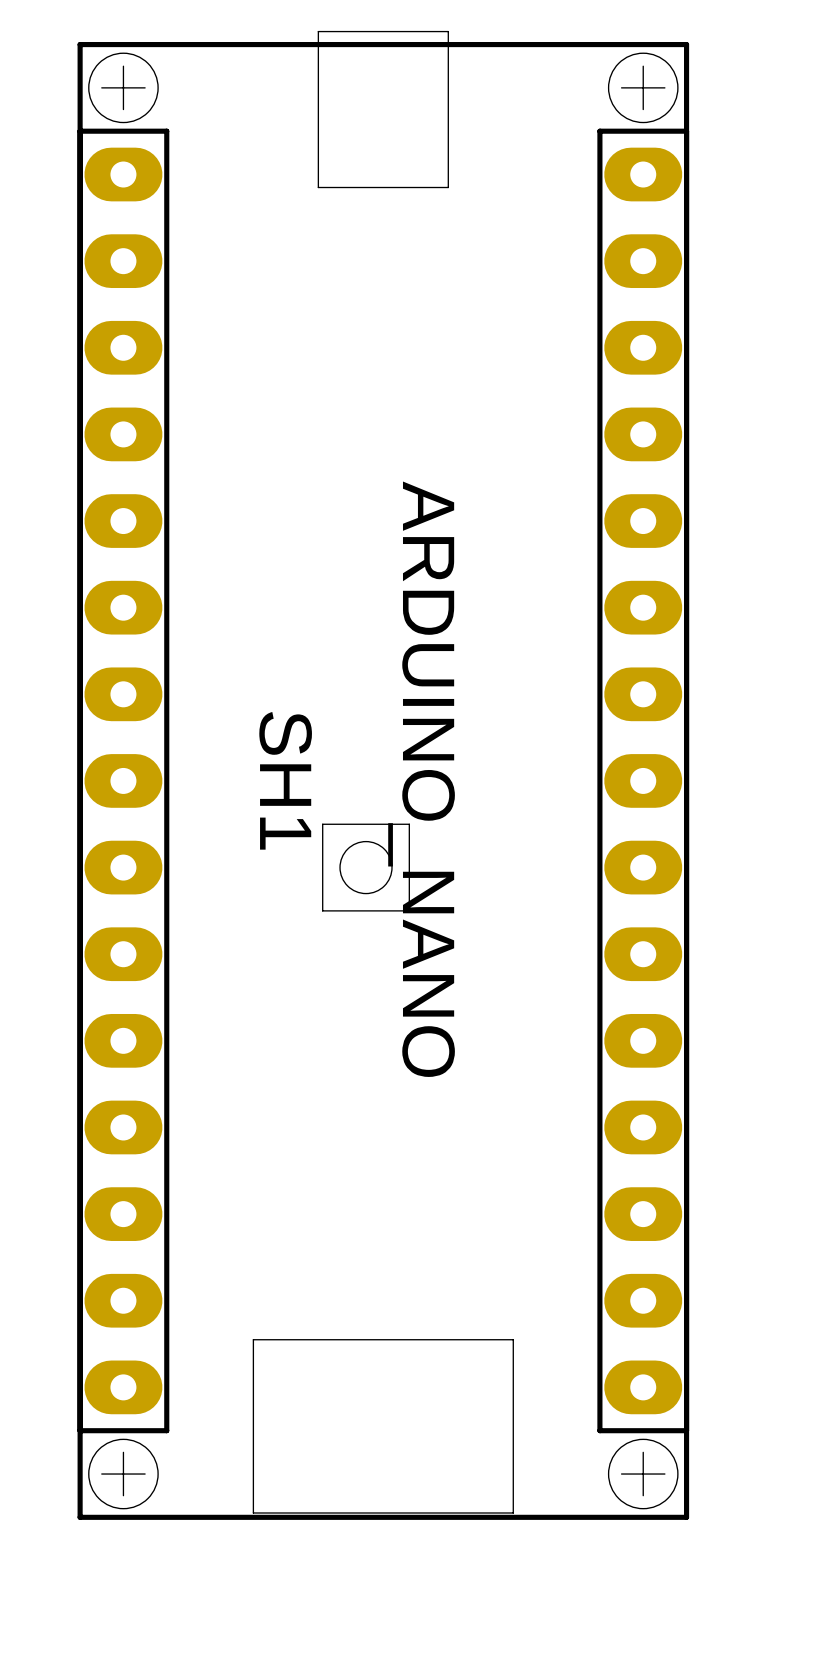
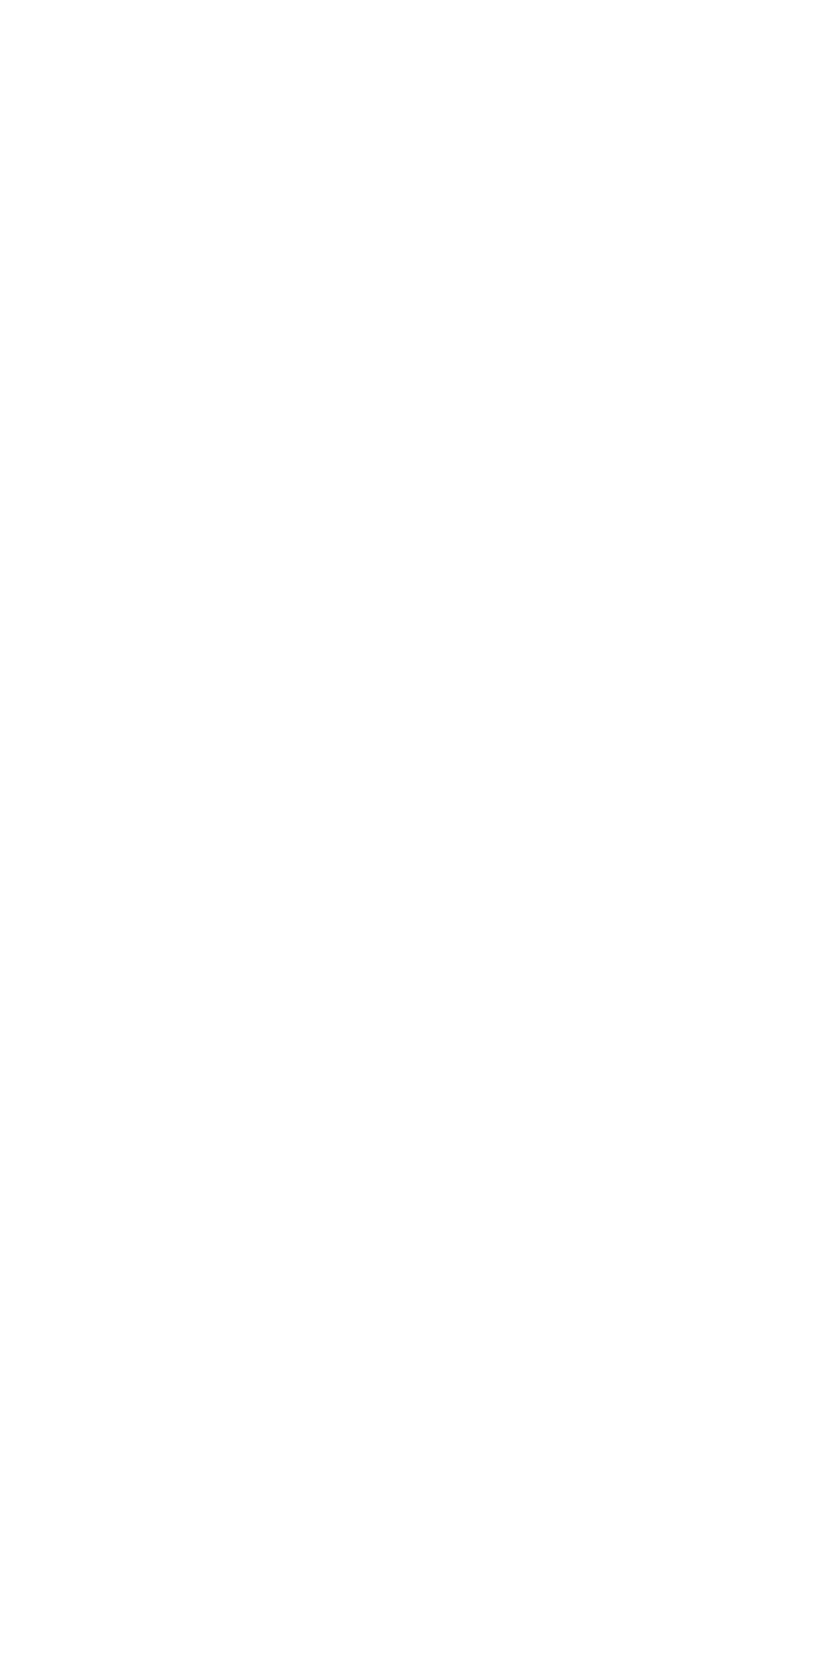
SH1: ARDUINO_NANO (383, 775) -> none

